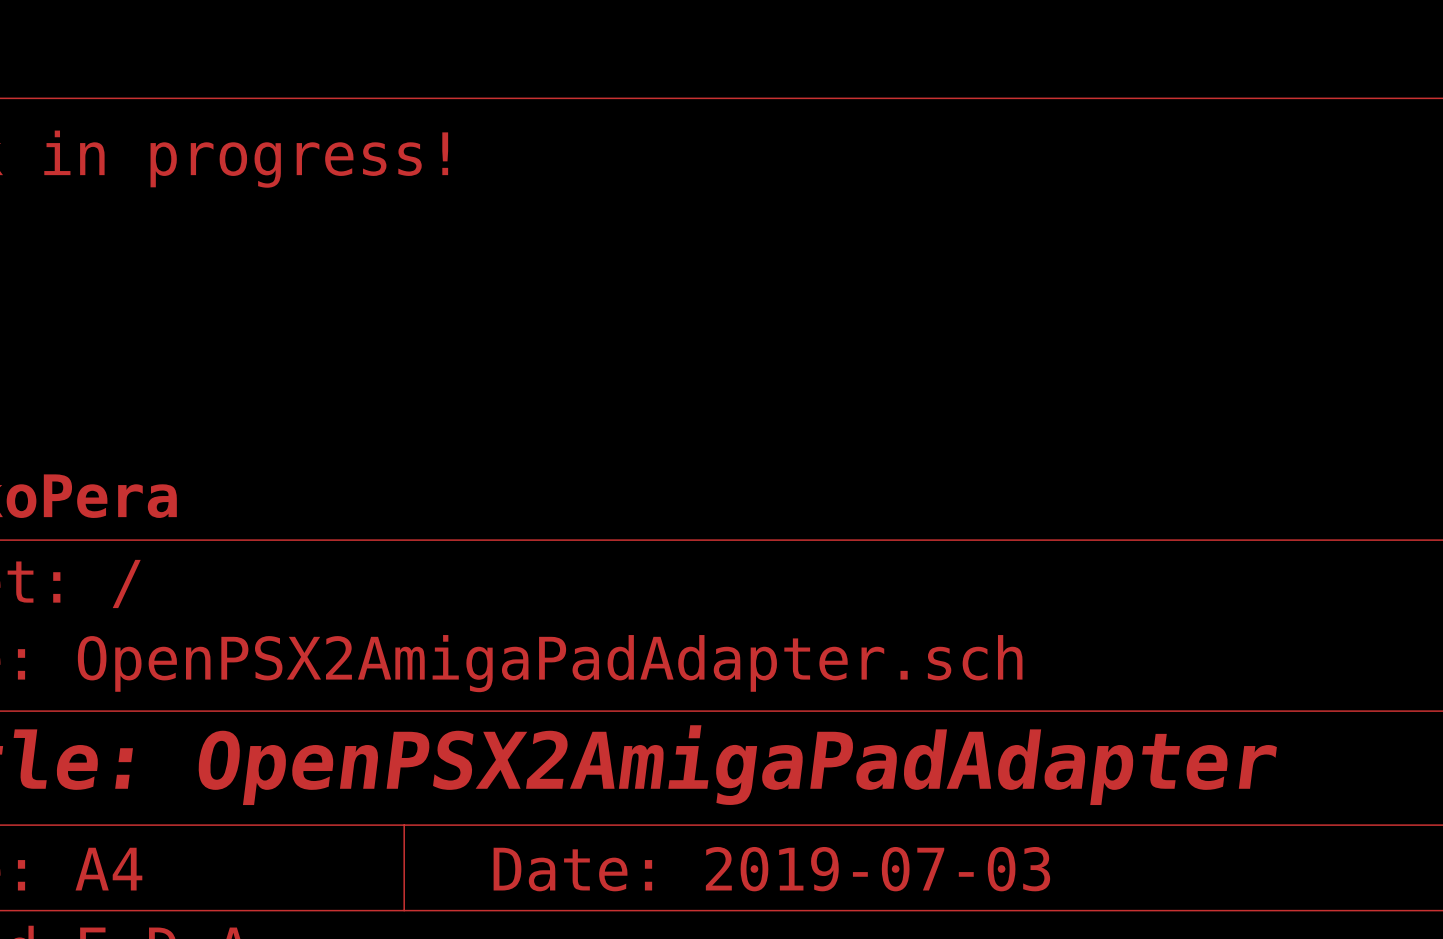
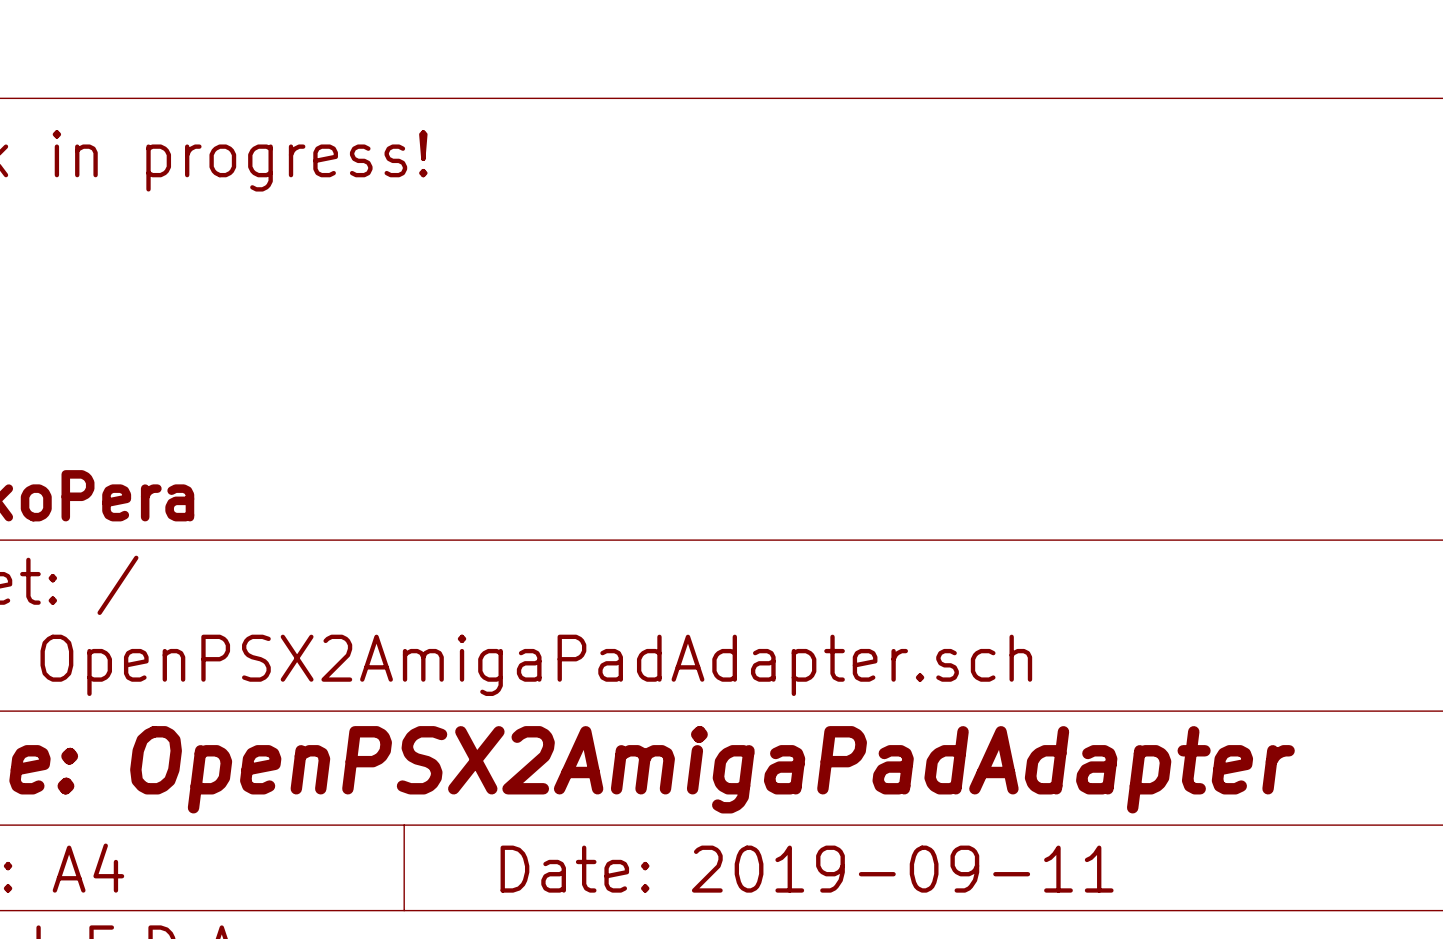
title block: Date: 2019-07-03 (771, 869) -> Date: 2019-09-11 (807, 869)

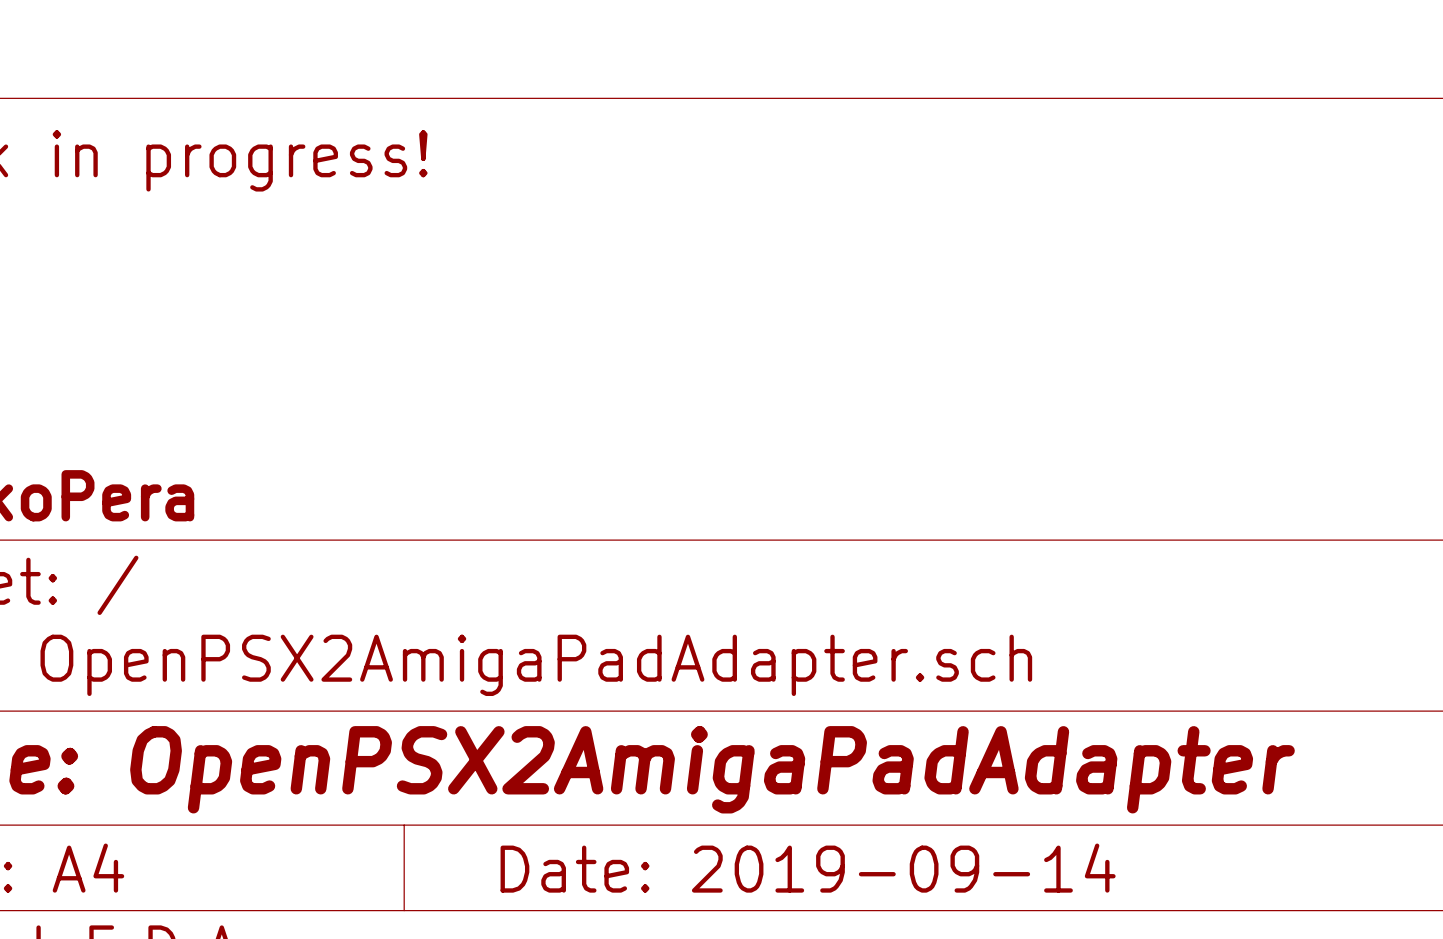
title block: Date: 2019-09-11 (807, 869) -> Date: 2019-09-14 (808, 868)

